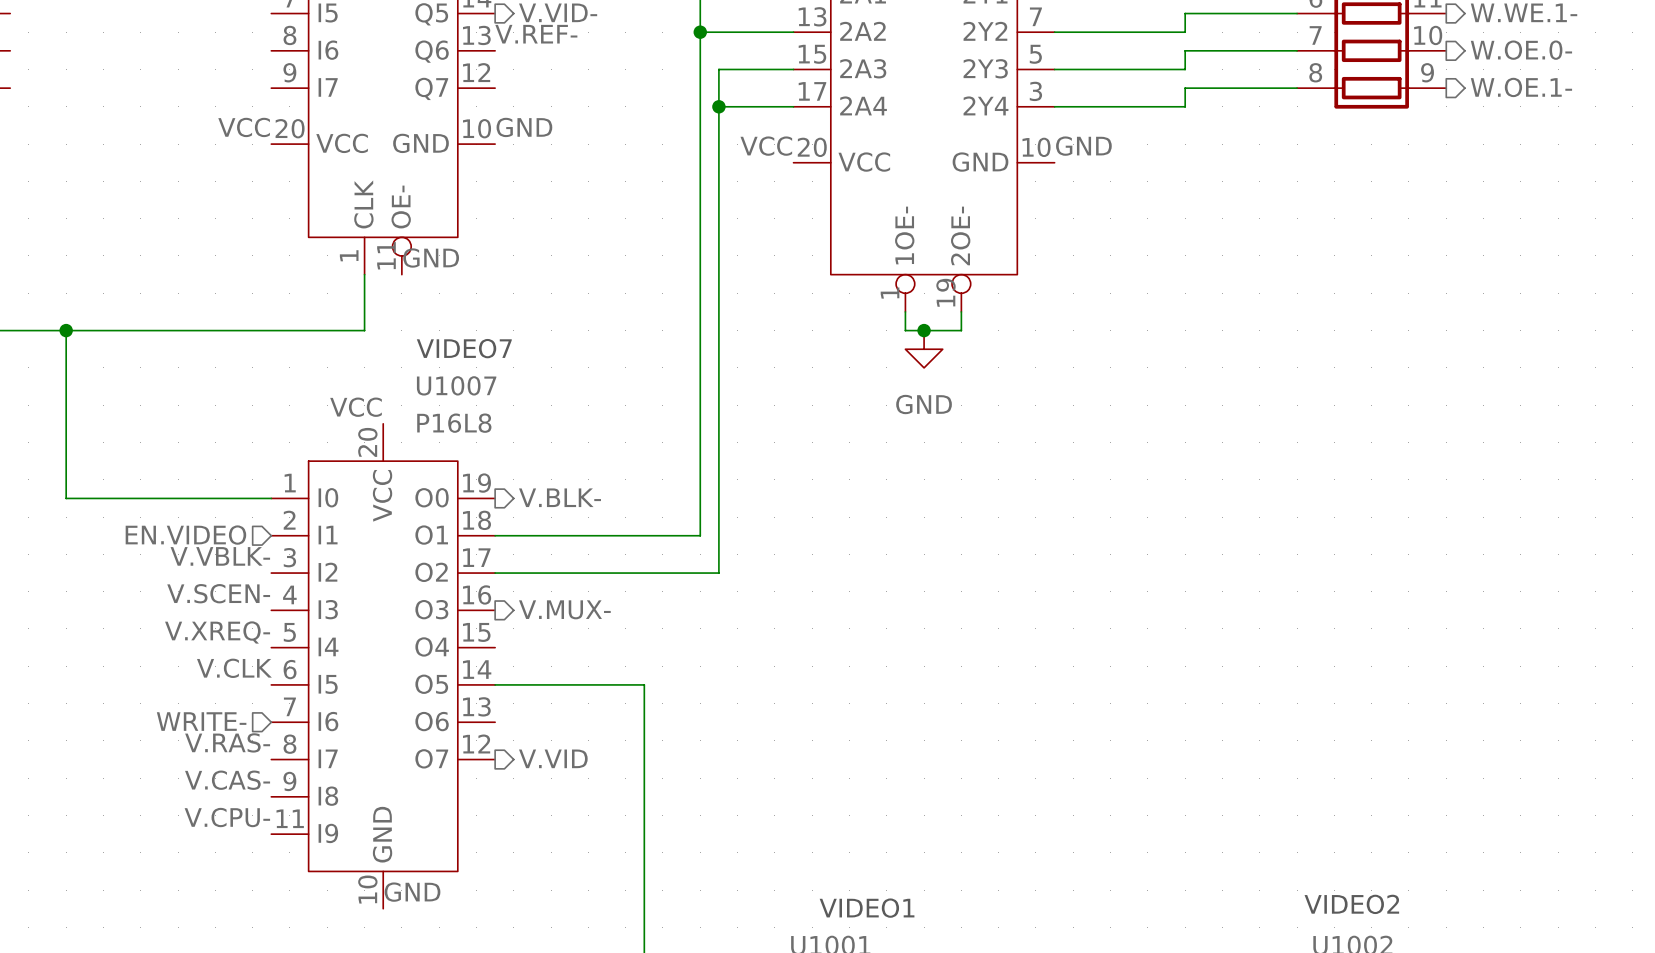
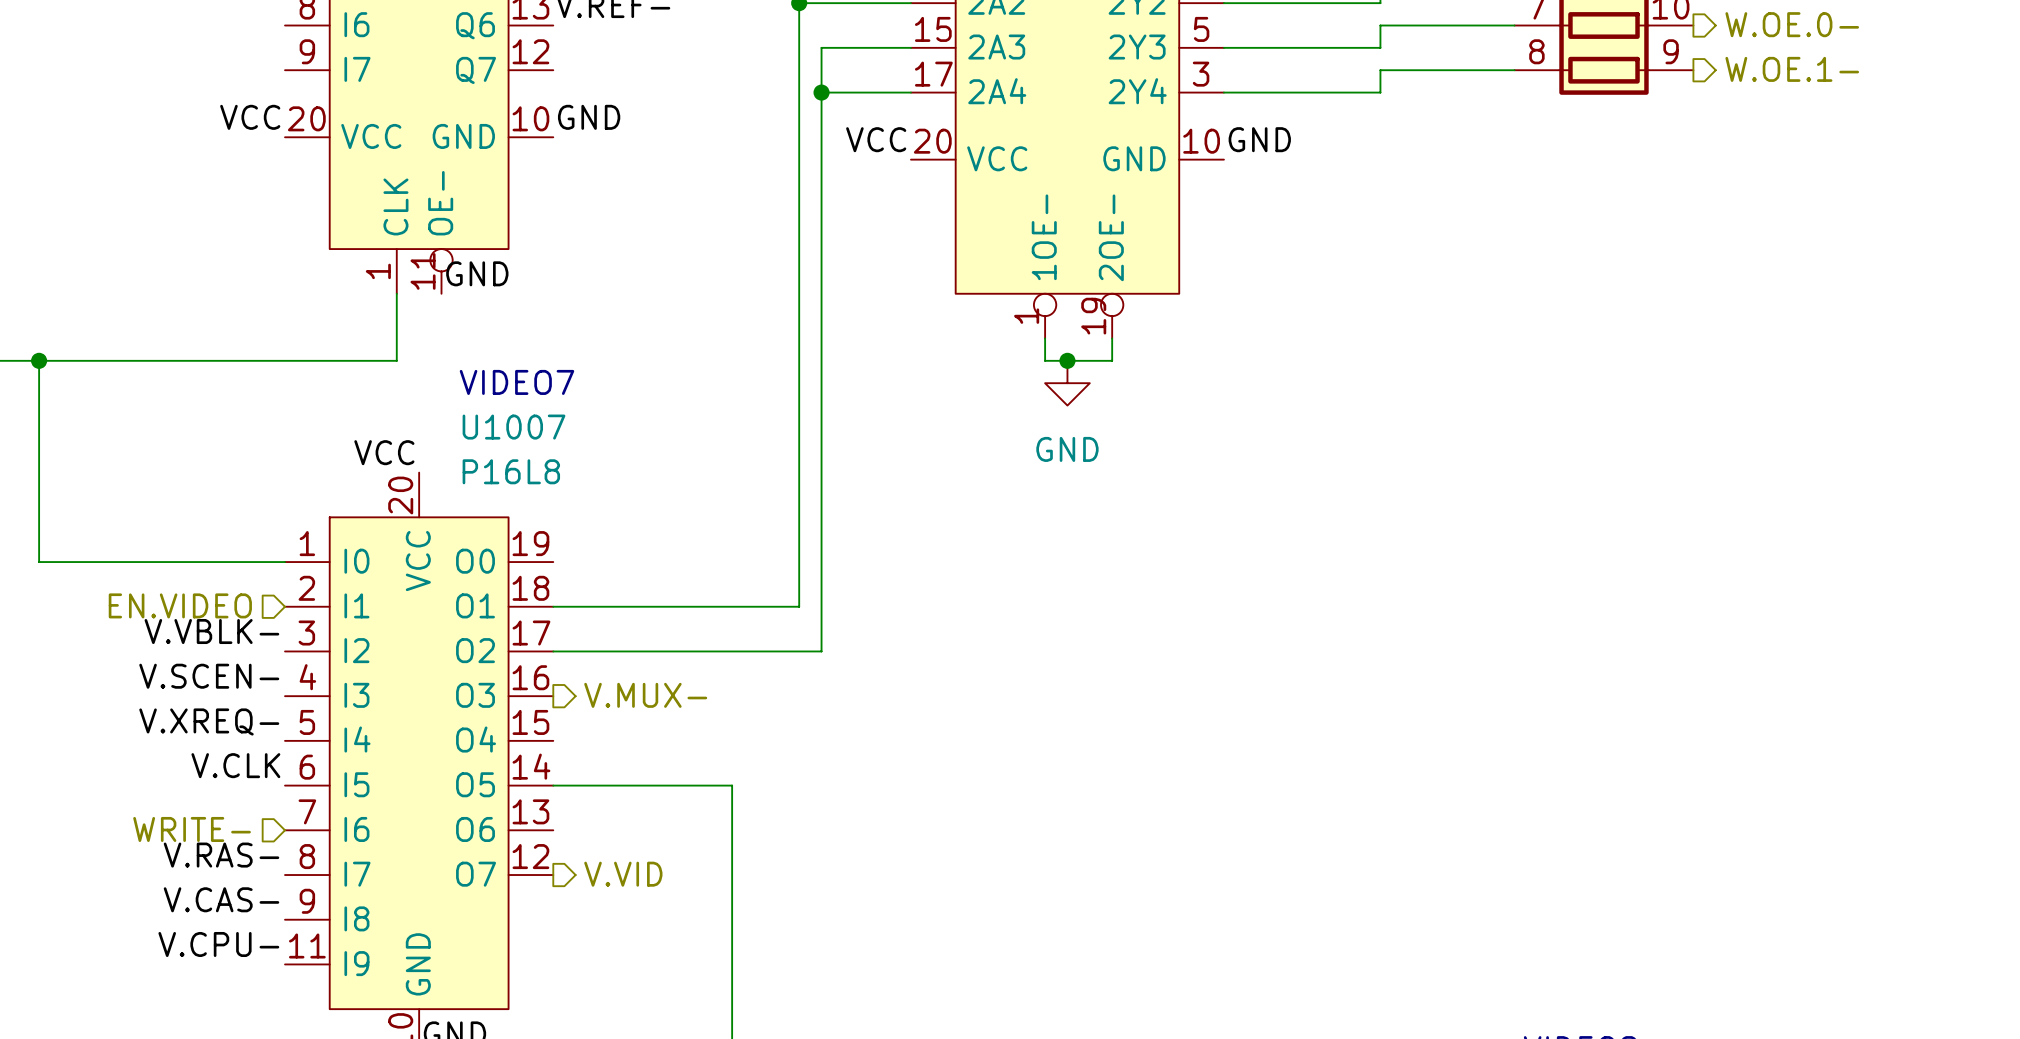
hierarchical label: V.BLK- (560, 497) -> none

